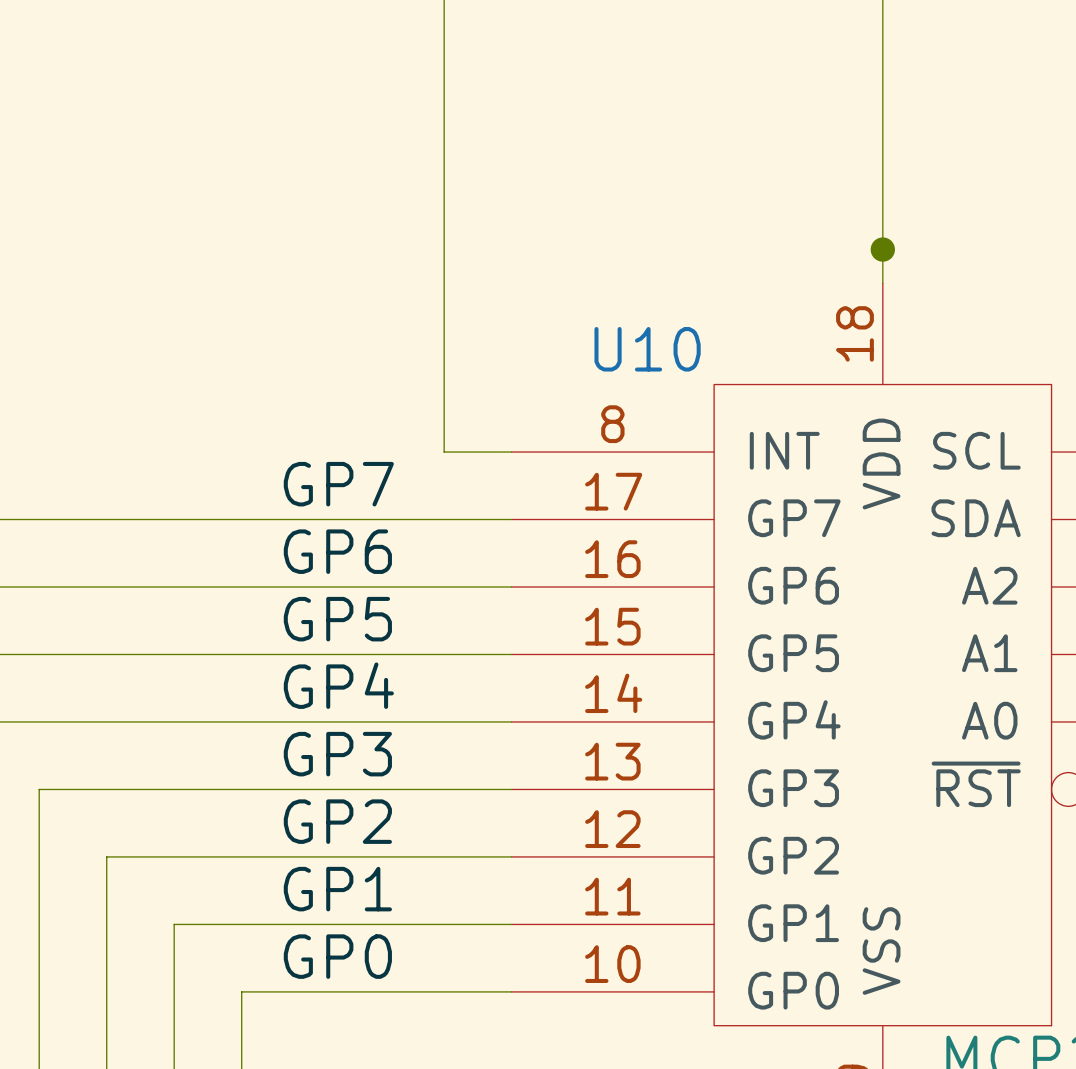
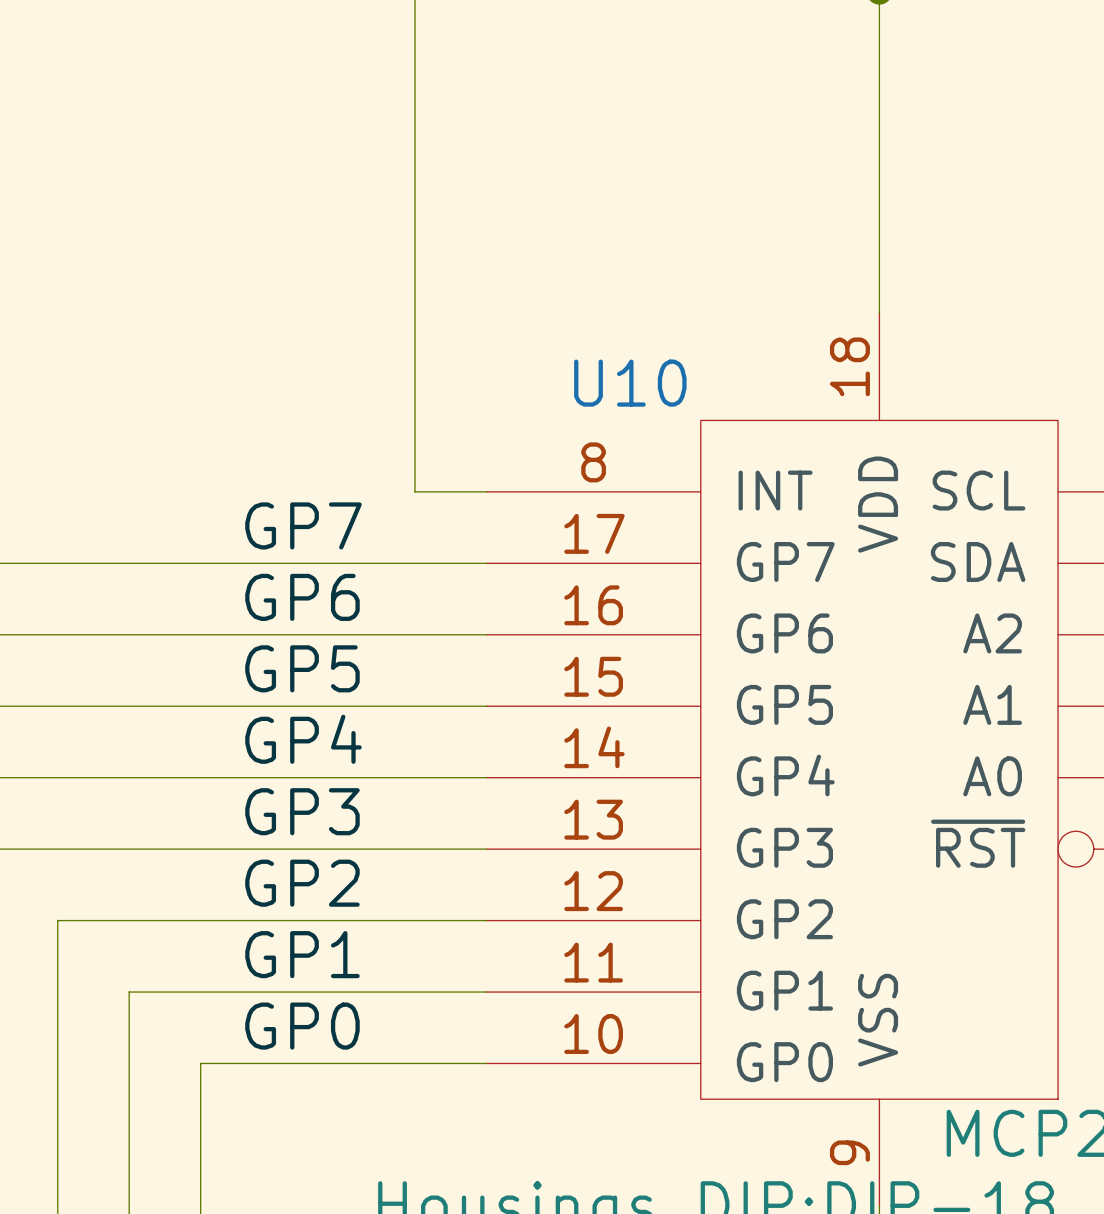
junction: (882, 249) -> none

